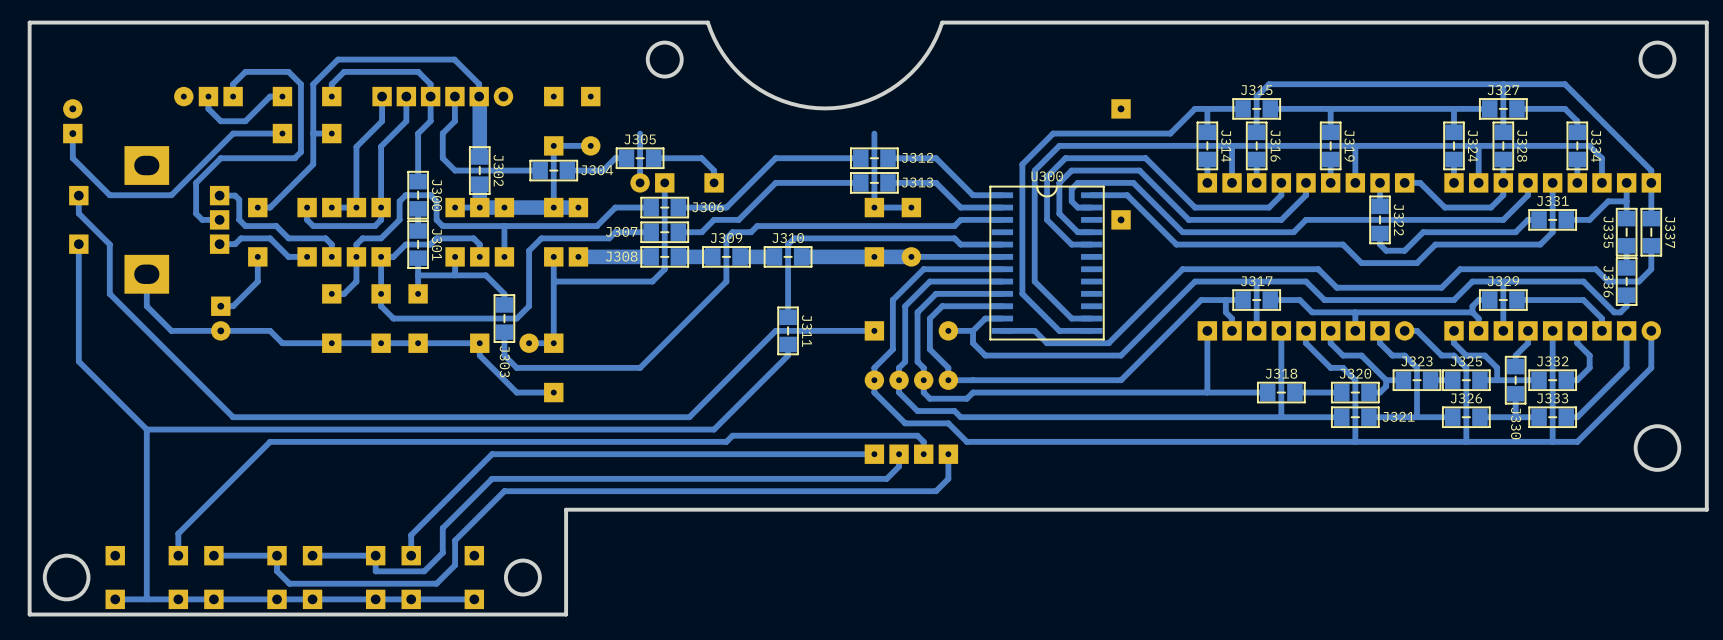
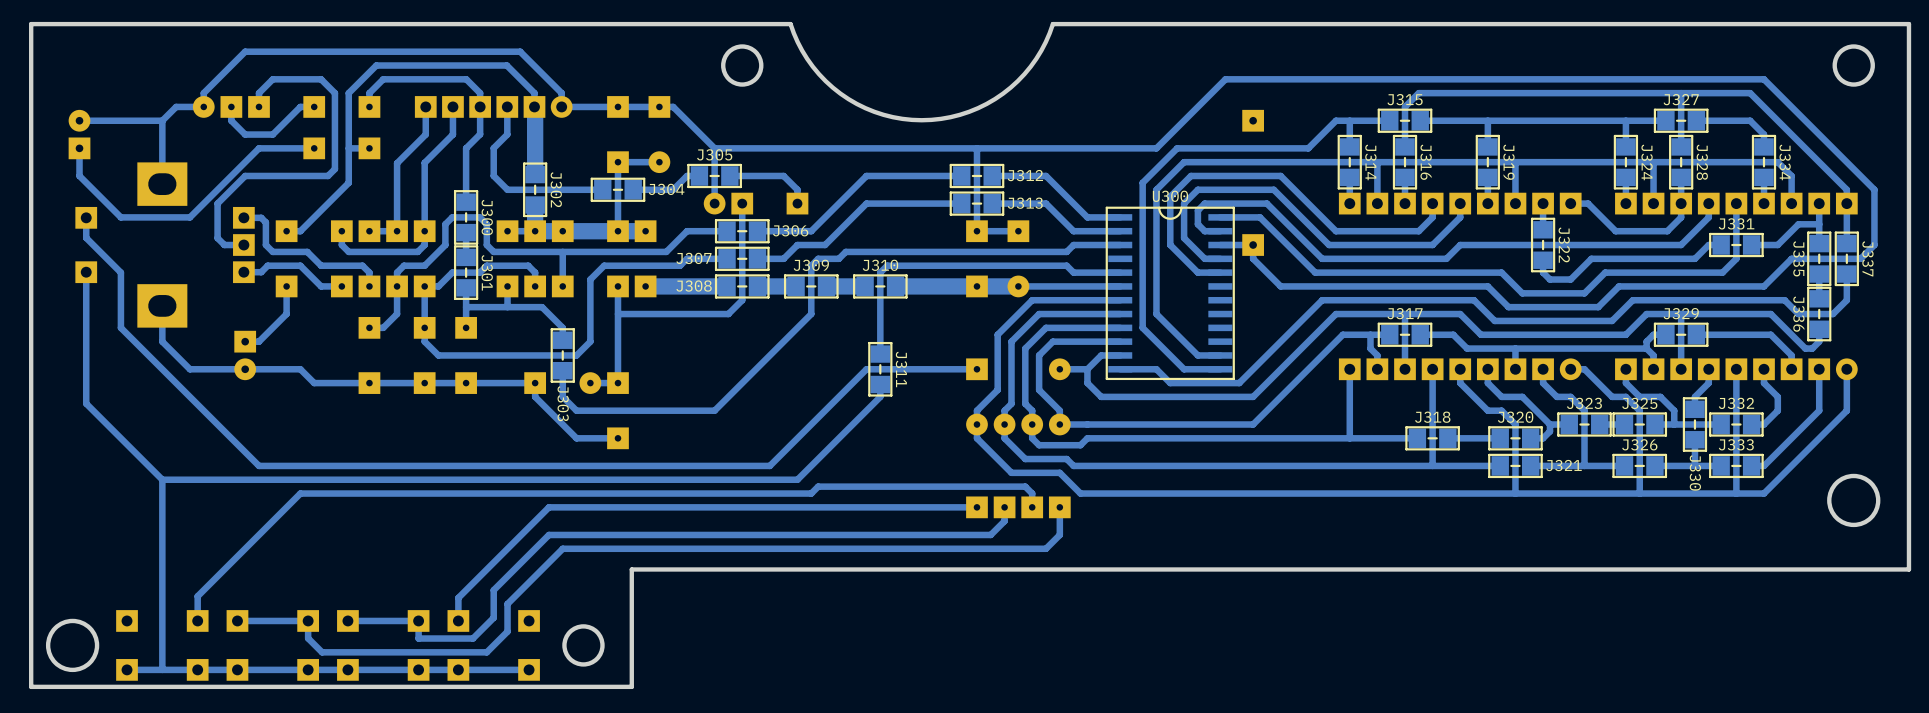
track: none -> (162, 120) (79, 120)
track: none -> (162, 120) (162, 184)
track: none -> (162, 120) (176, 106) (203, 106) (203, 93) (245, 51) (520, 51) (561, 93) (561, 106) (673, 106) (714, 148) (1156, 148) (1225, 79) (1764, 79) (1874, 189) (1874, 245) (1860, 258) (1791, 258) (1764, 286) (1619, 286) (1598, 307) (1508, 307) (1487, 286) (1280, 286) (1253, 258) (1253, 245) (1220, 245)

